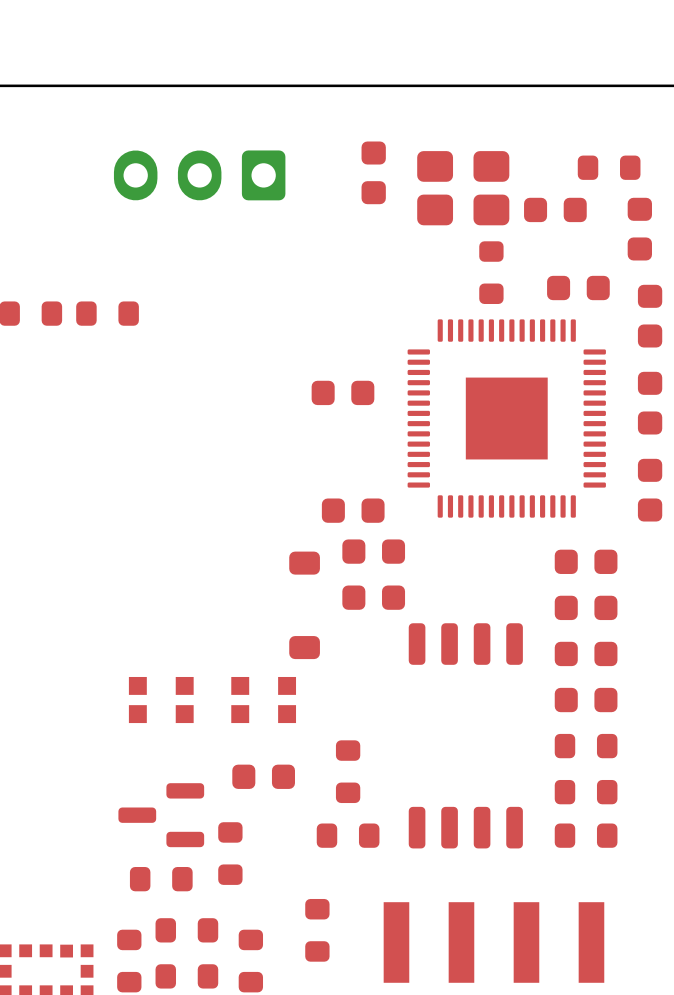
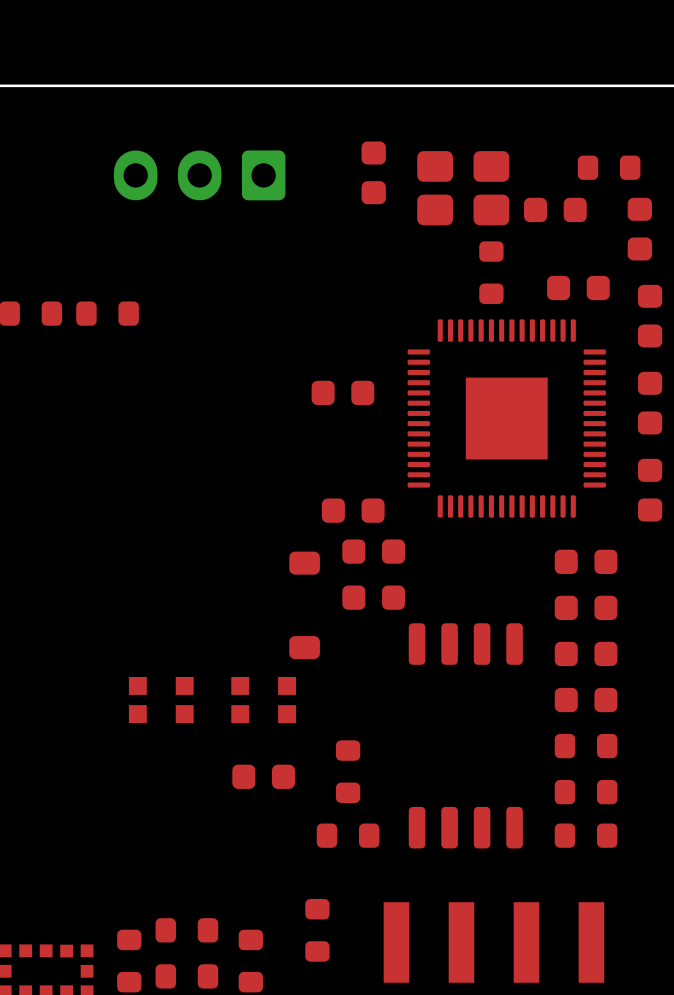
part: (161, 815) -> none
part: (230, 853) -> none
part: (161, 879) -> none

